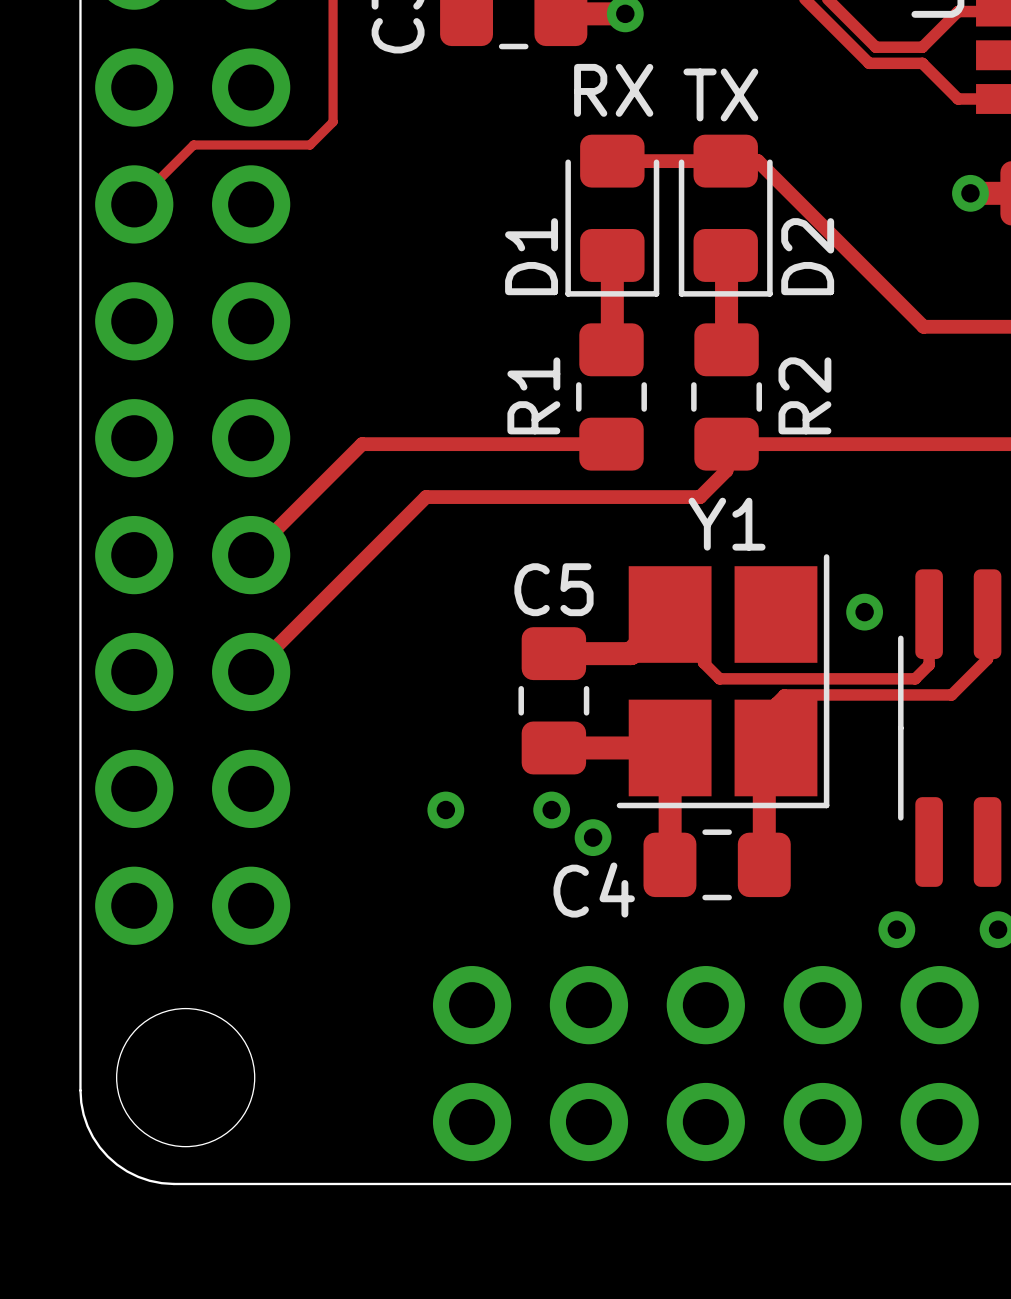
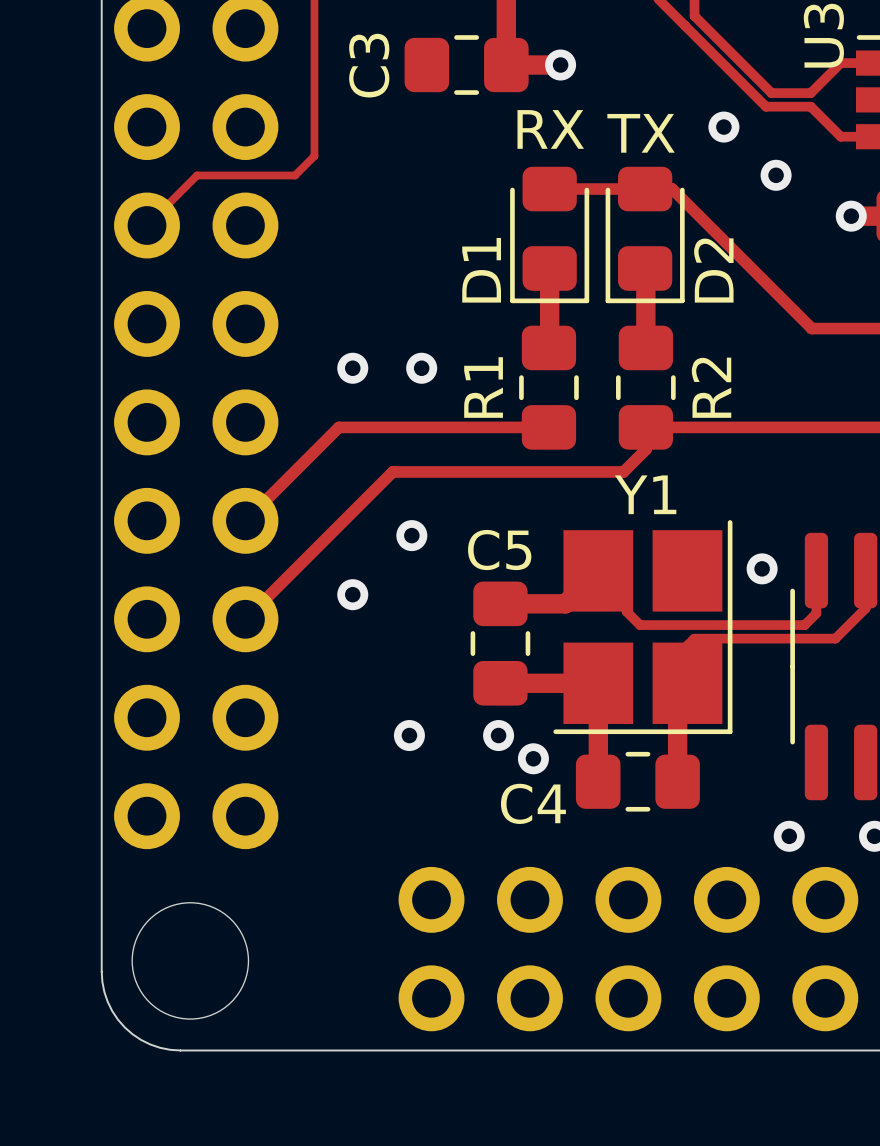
via: none -> (723, 127)
via: none -> (776, 175)
via: none -> (352, 368)
via: none -> (421, 368)
via: none -> (411, 535)
via: none -> (352, 594)

